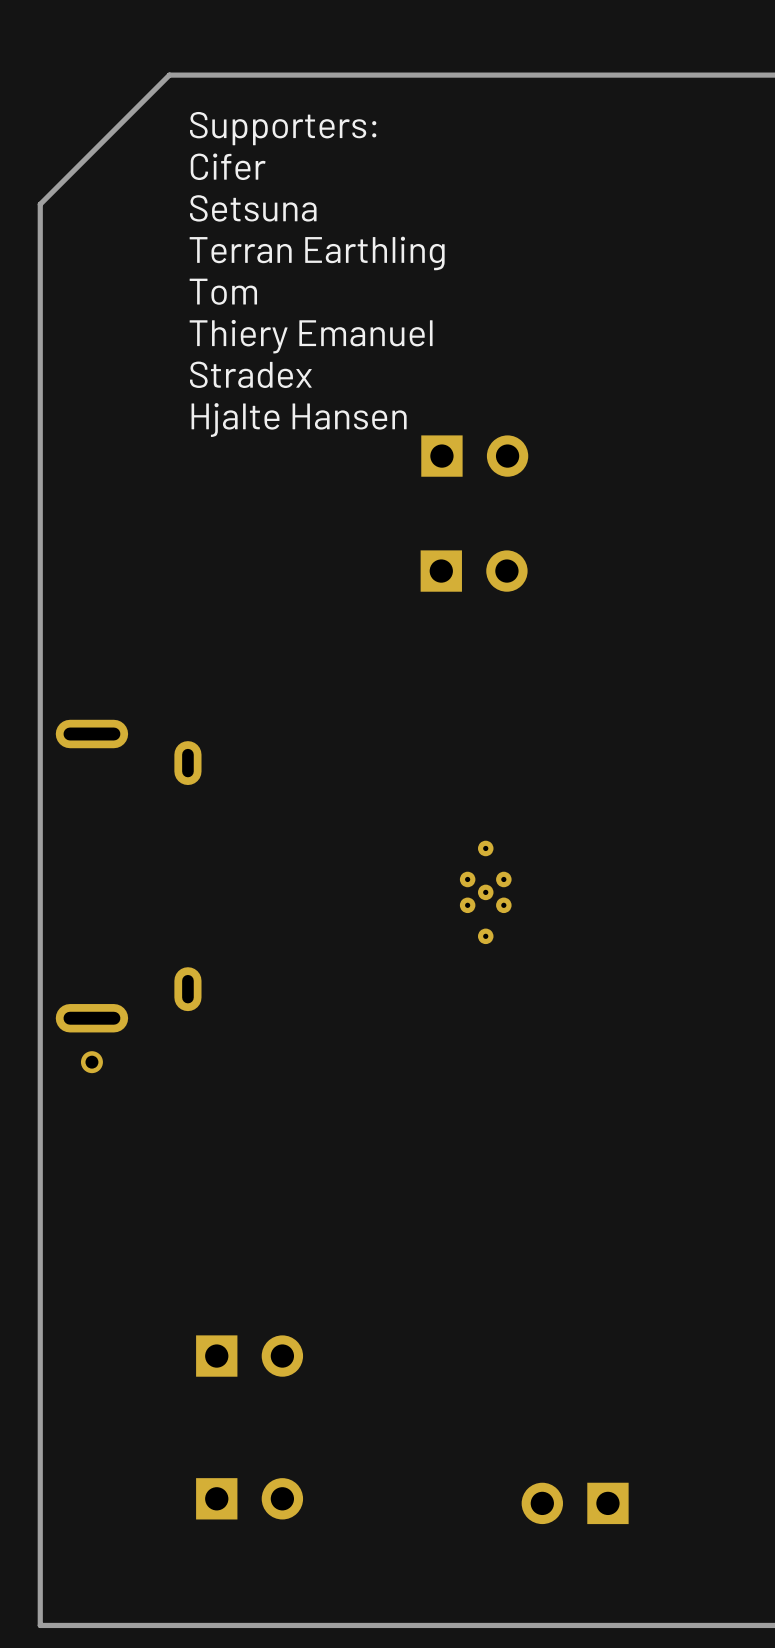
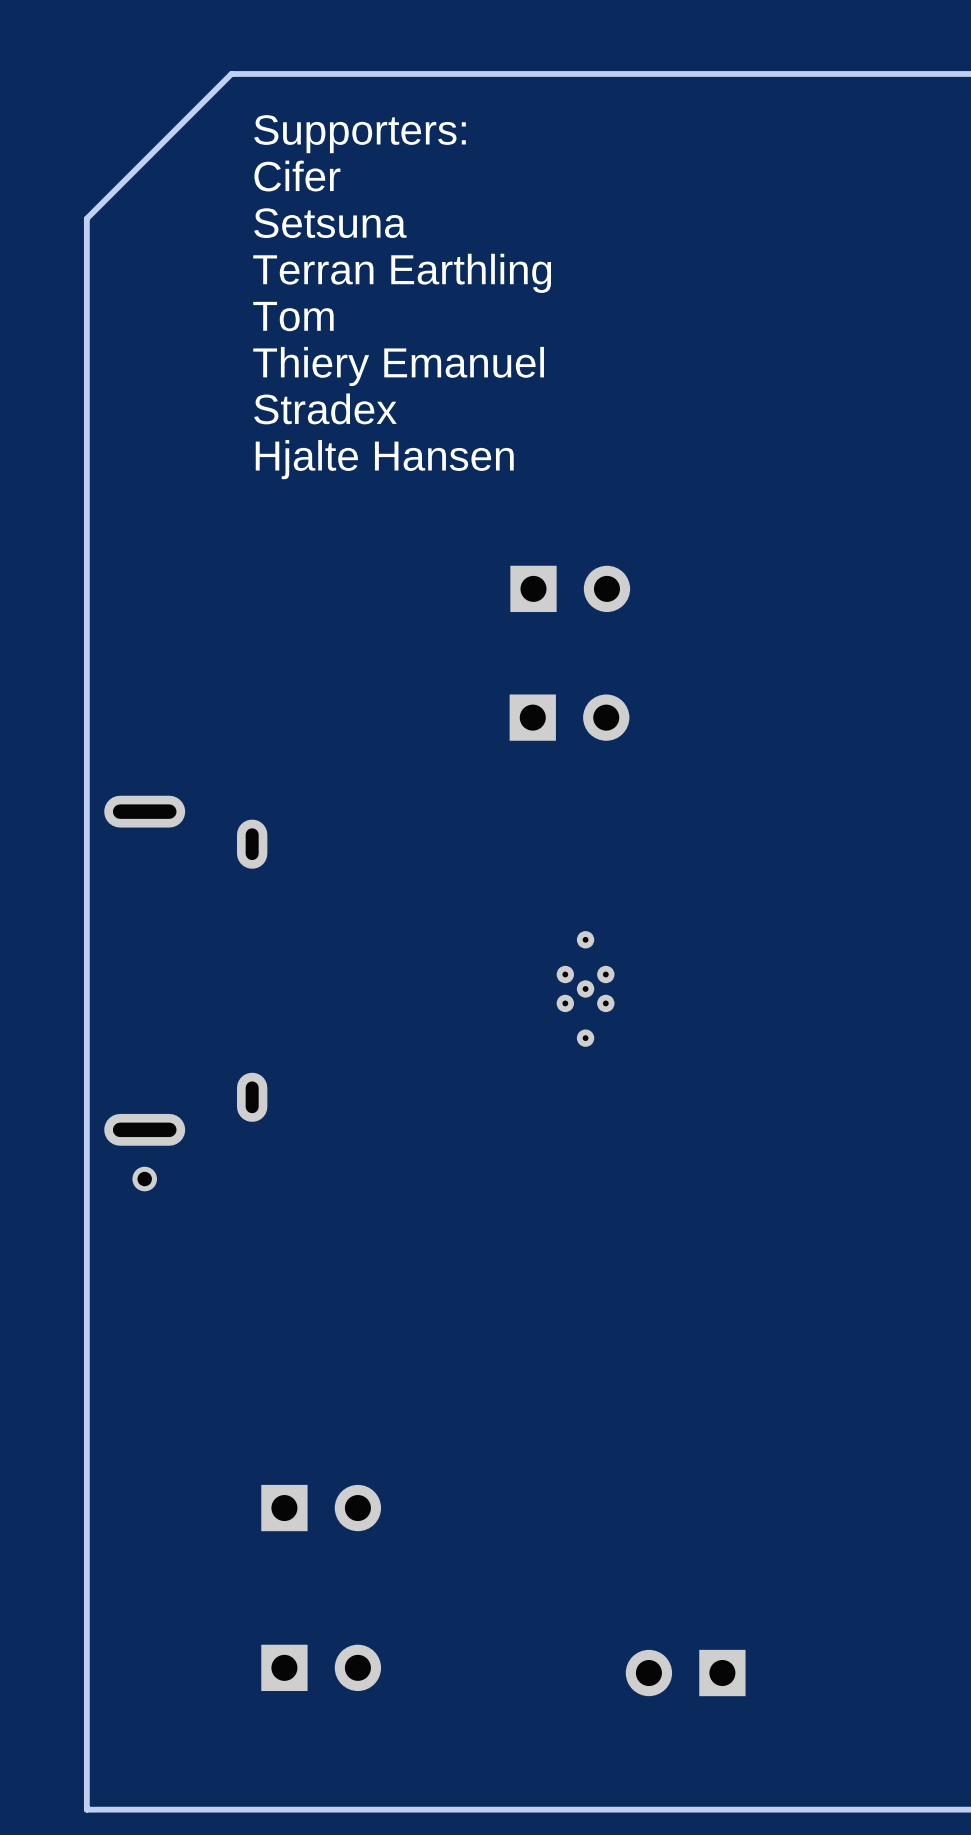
part: (474, 456) -> none
part position: (474, 571) -> (570, 588)
part: none -> (569, 717)

